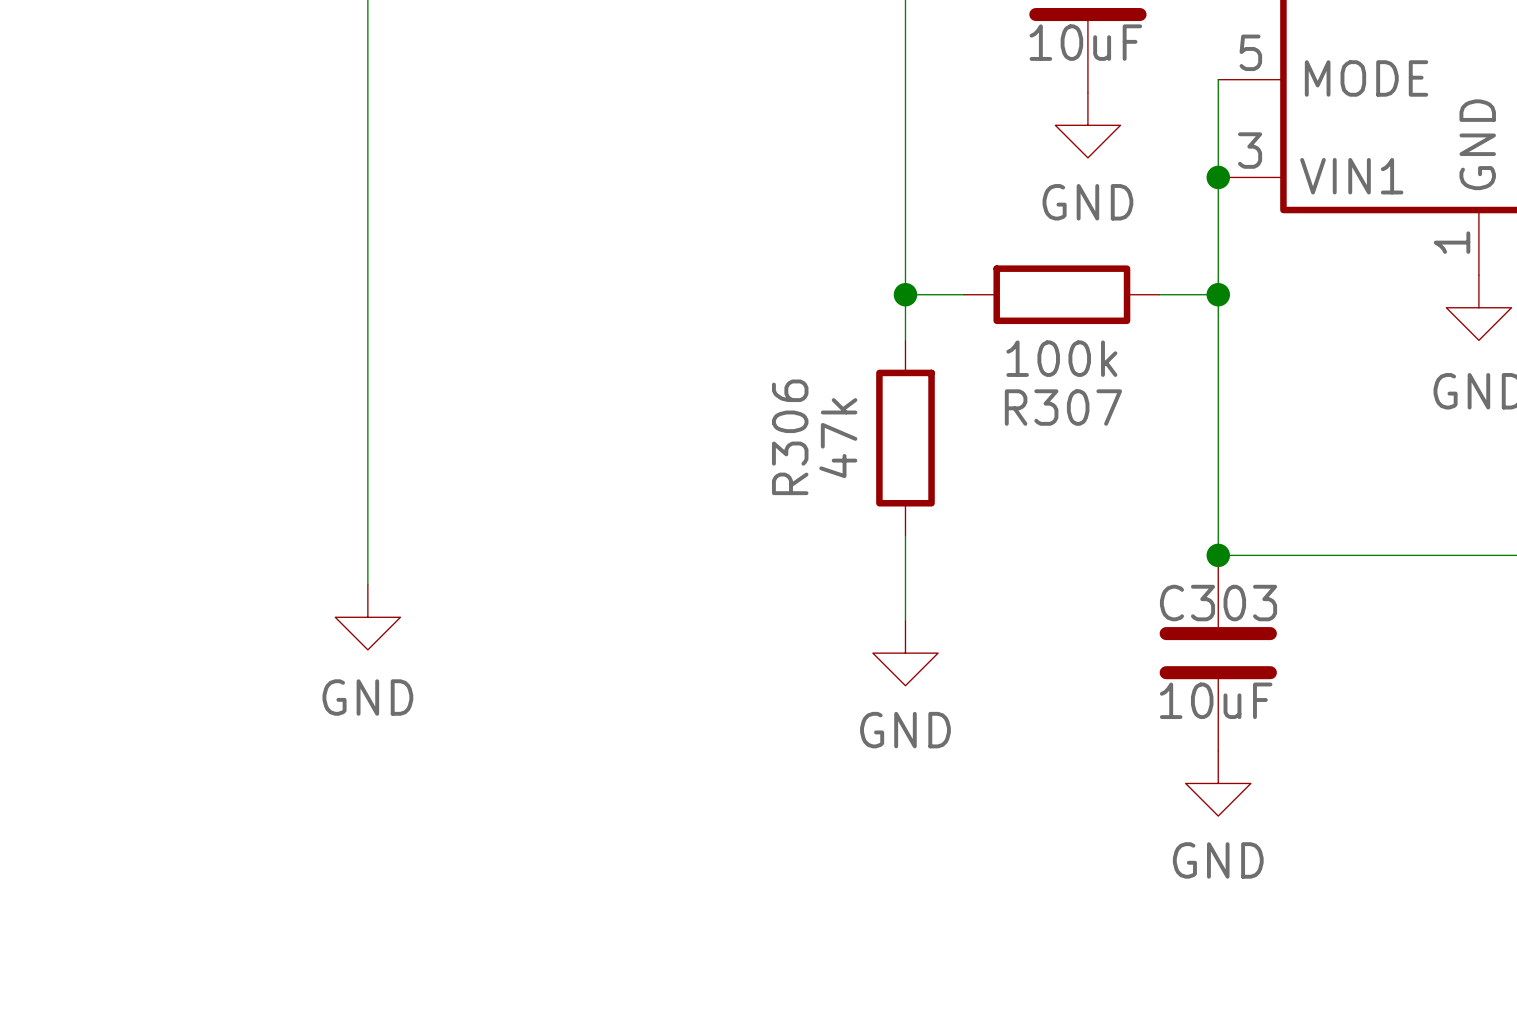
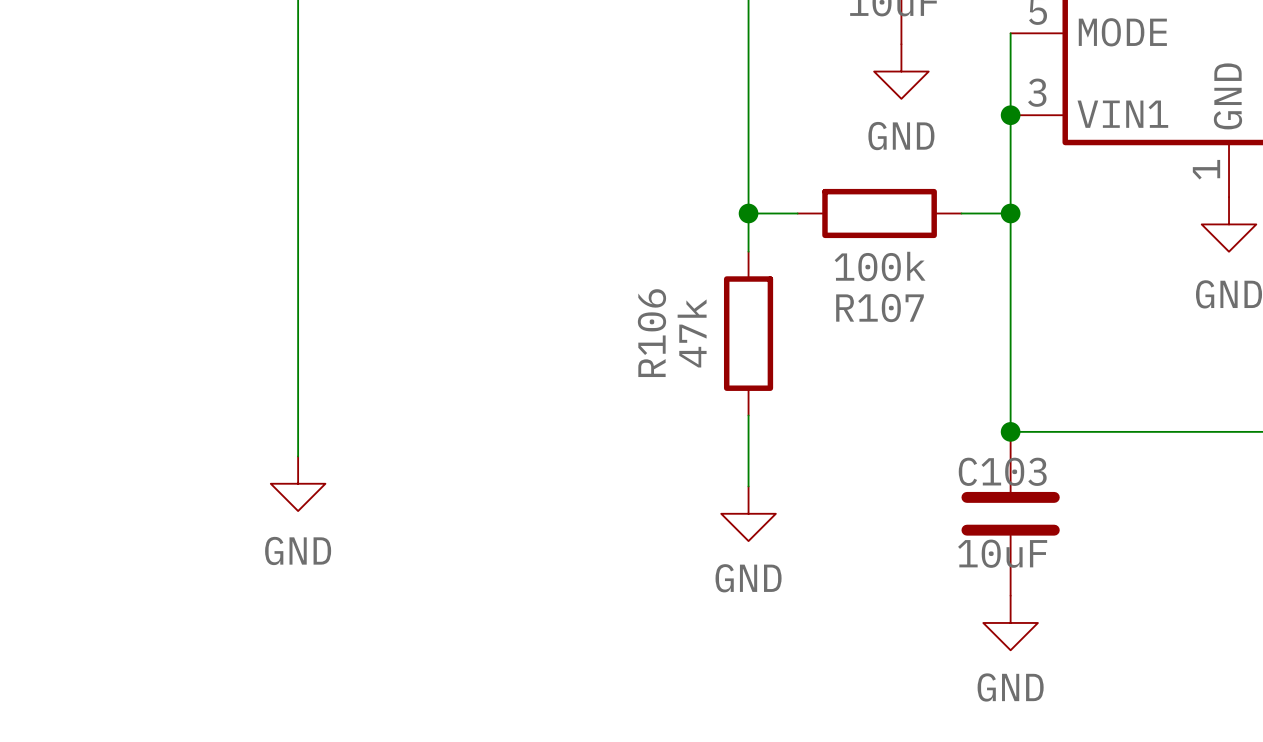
R307 name: R307 (1063, 407) -> R107 (879, 308)
R306 name: R306 (790, 437) -> R106 (651, 333)
C303 name: C303 (1218, 603) -> C103 (1002, 471)

